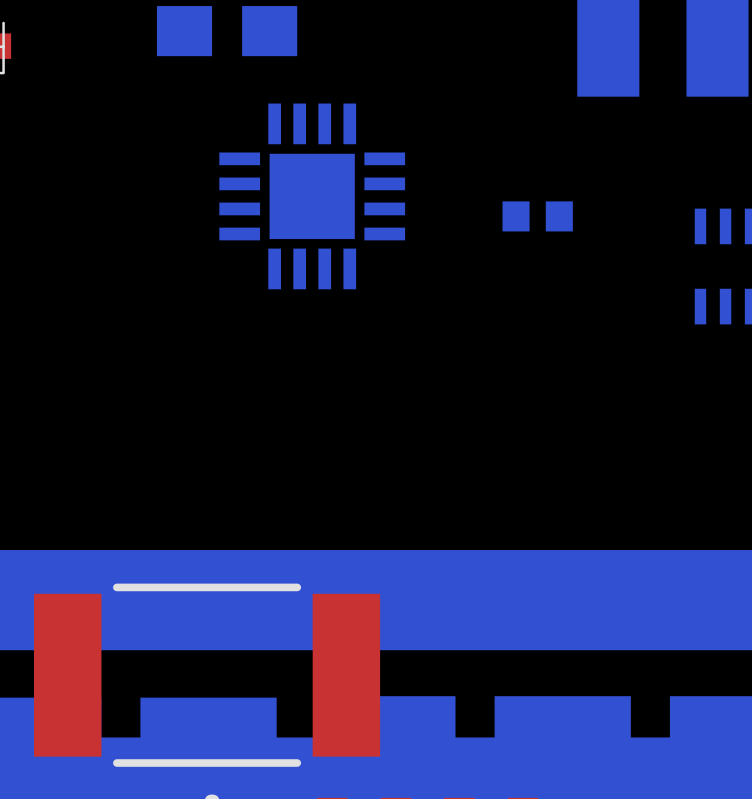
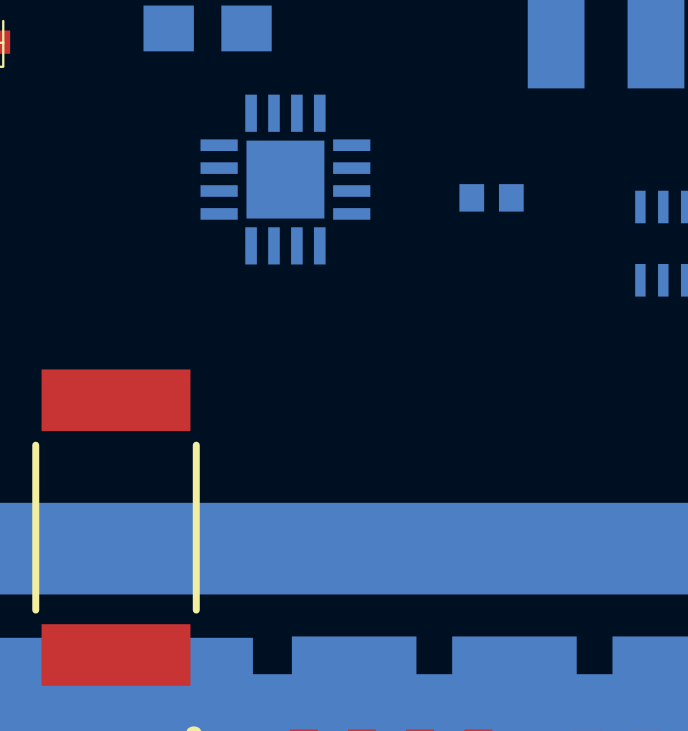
part rotation: 0° (207, 675) -> 90° clockwise (116, 527)

